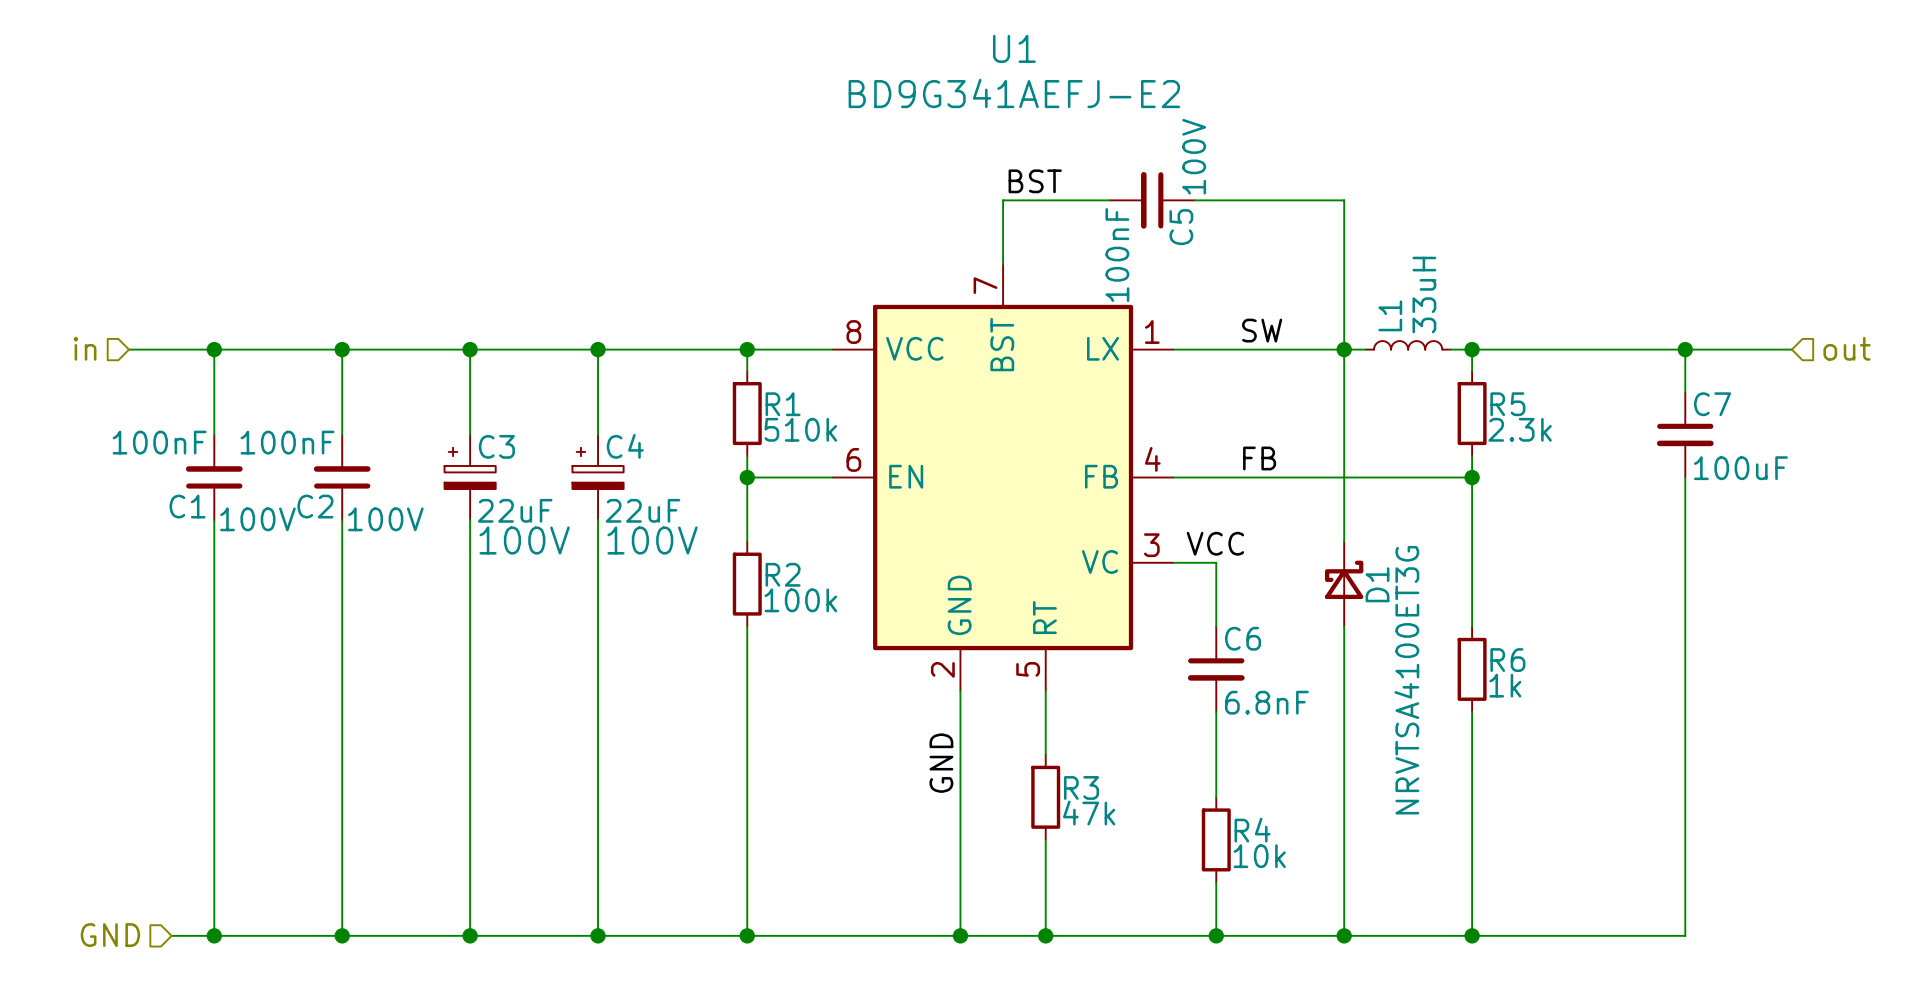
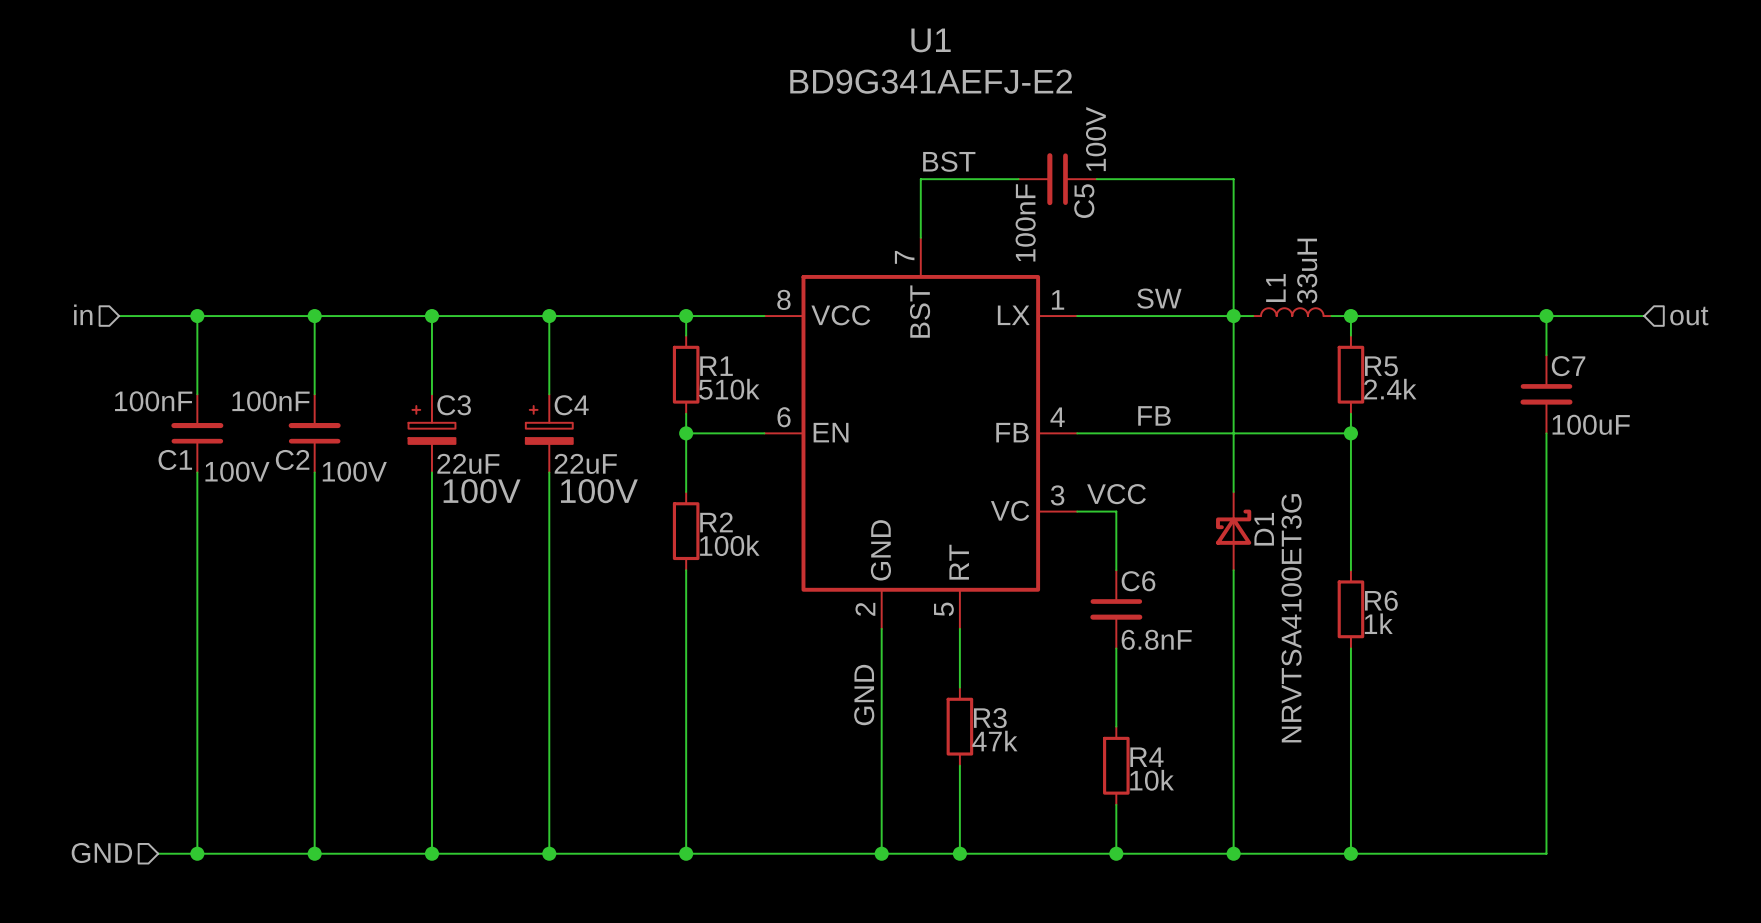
R5 value: 2.3k (1520, 429) -> 2.4k (1390, 389)

